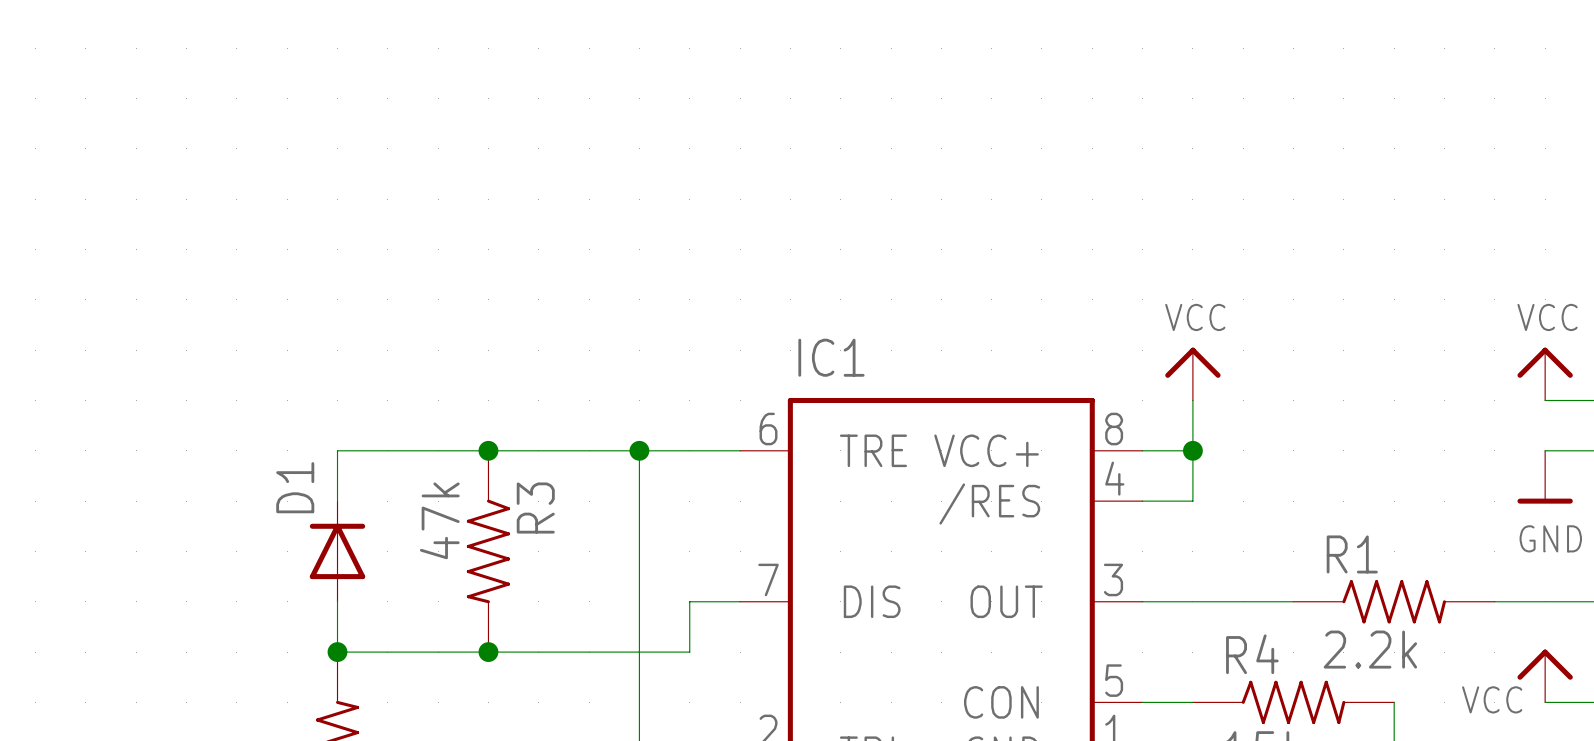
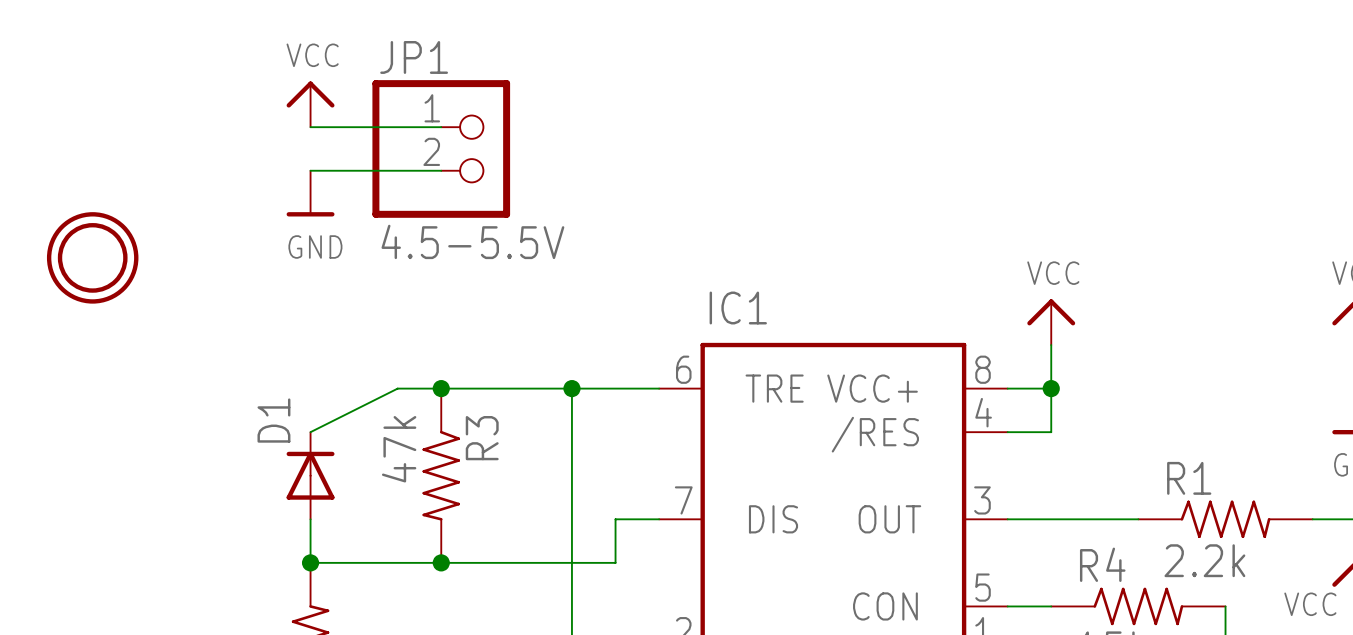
power symbol: none -> VCC (310, 104)
wire: none -> (310, 127) (441, 127)
JP1: none -> 4.5-5.5V (441, 148)
wire: none -> (310, 170) (441, 170)
power symbol: none -> GND (310, 193)
part: none -> (92, 257)
wire: (438, 450) (337, 450) (337, 501) -> (397, 388) (310, 432)

